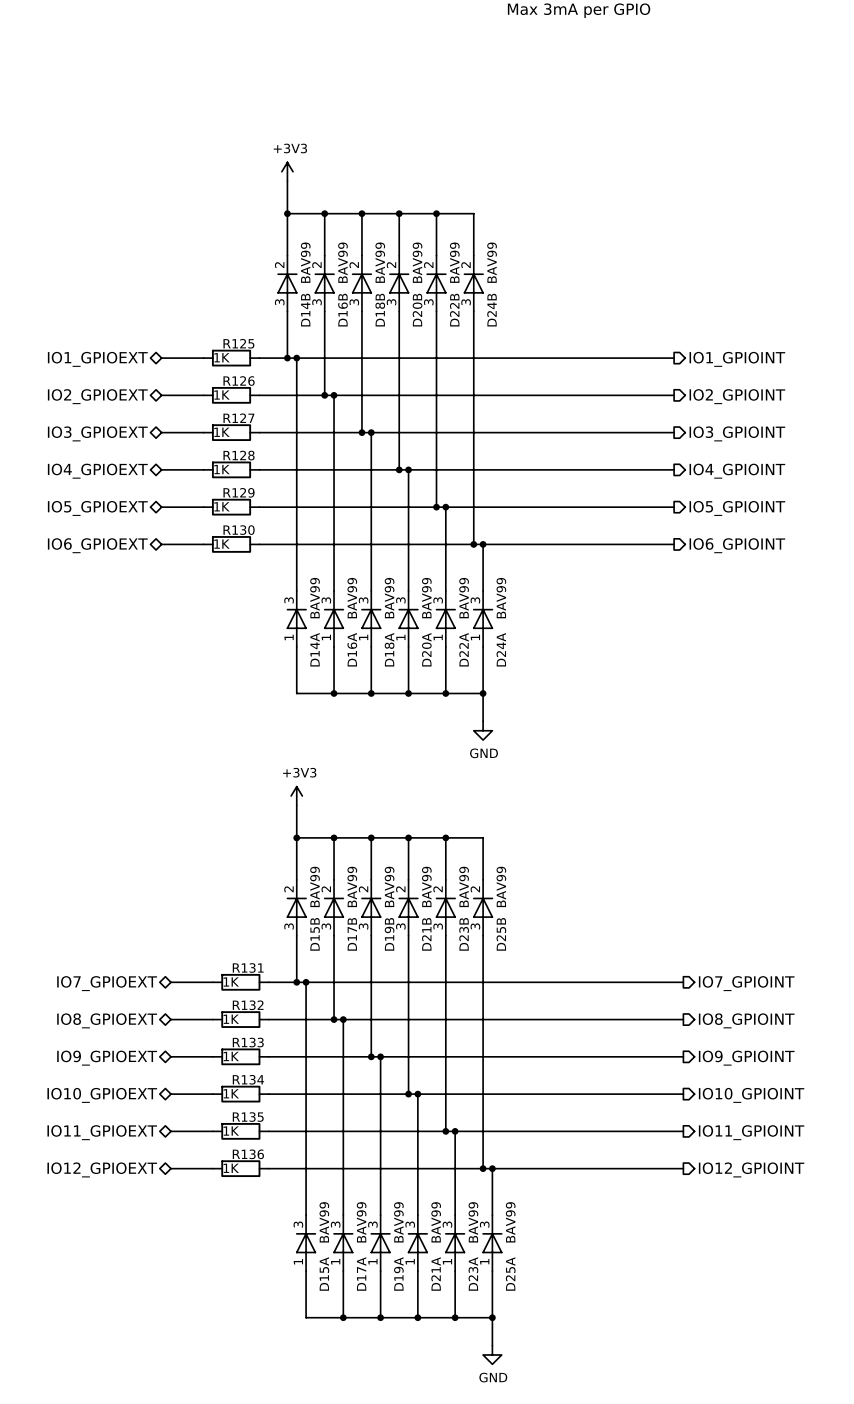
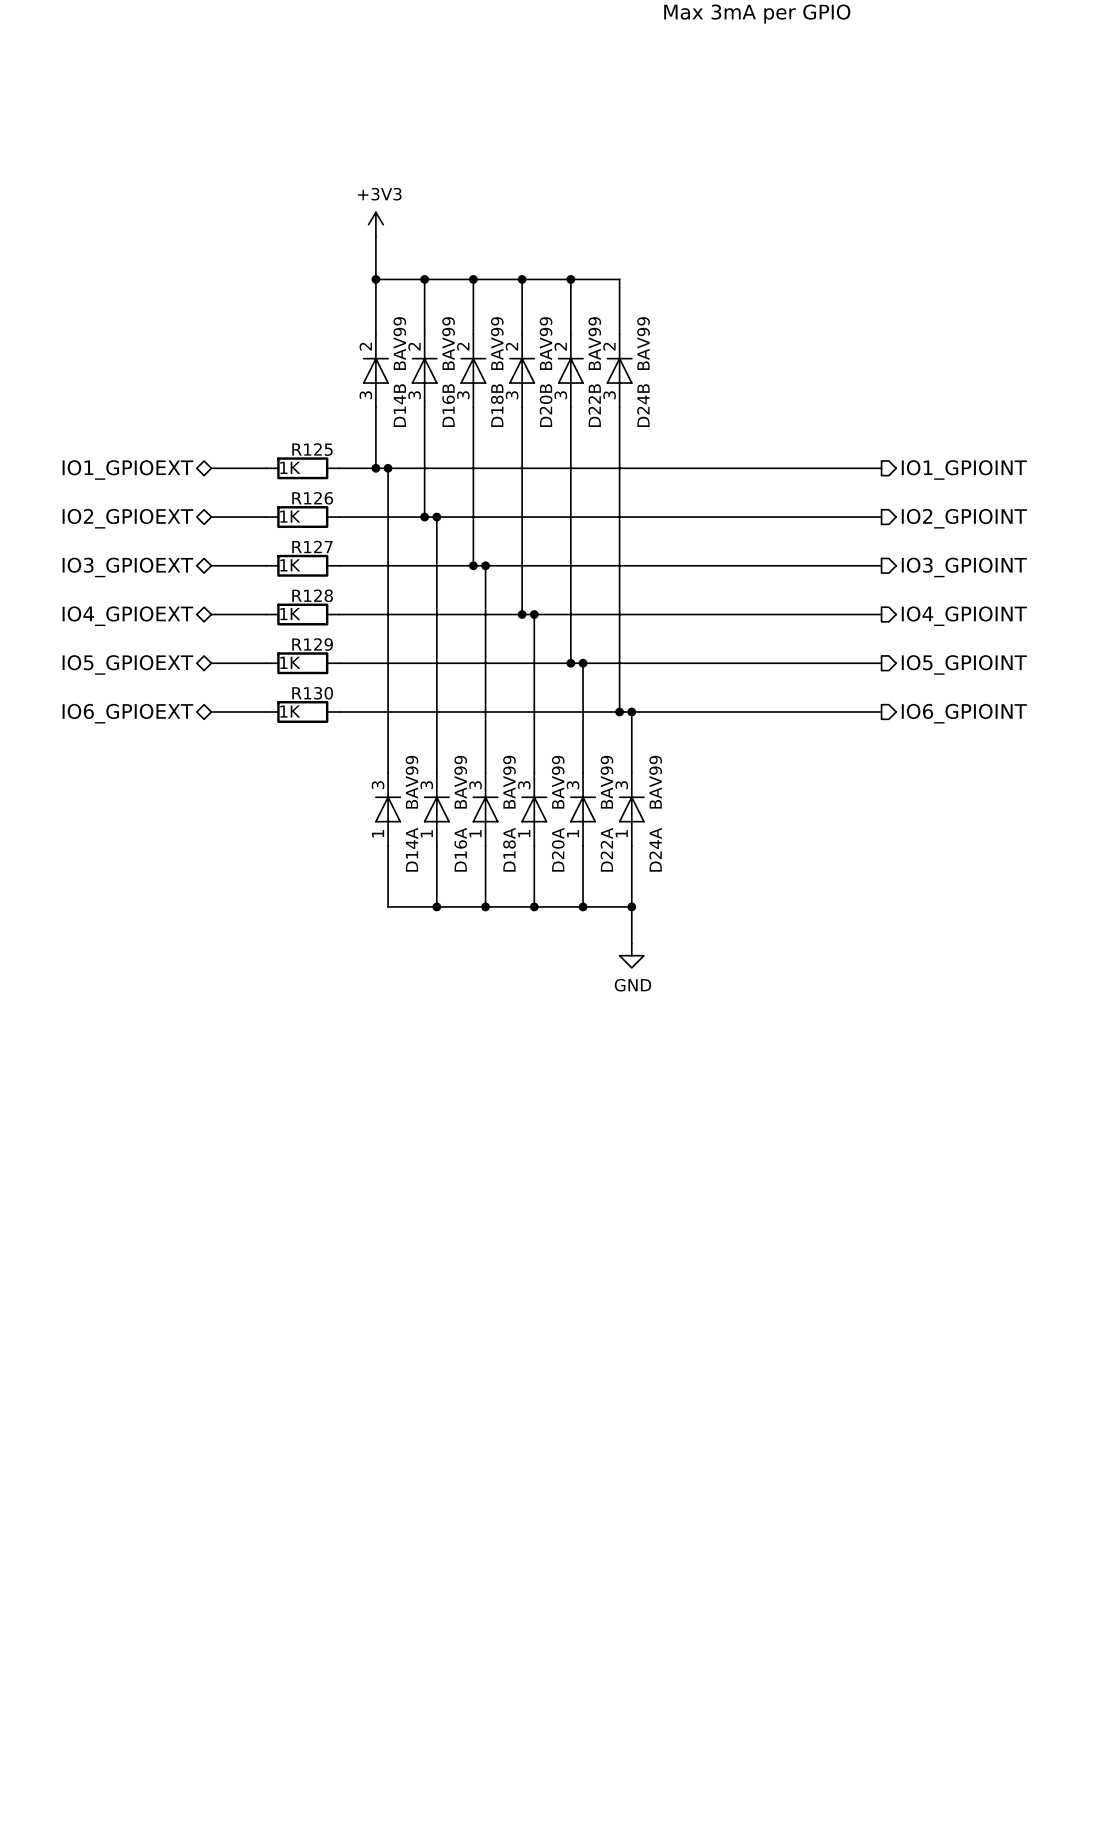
power symbol: +3V3 (296, 795) -> none
wire: (296, 805) (296, 879) -> none
wire: (296, 837) (483, 837) (483, 879) -> none
junction: (296, 837) -> none
wire: (334, 837) (334, 879) -> none
junction: (334, 837) -> none
wire: (371, 837) (371, 879) -> none
junction: (371, 837) -> none
wire: (408, 837) (408, 879) -> none
junction: (408, 837) -> none
wire: (445, 837) (445, 879) -> none
junction: (445, 837) -> none
D15B: BAV99 (296, 907) -> none
D17B: BAV99 (334, 907) -> none
D19B: BAV99 (371, 907) -> none
D21B: BAV99 (408, 907) -> none
D23B: BAV99 (445, 907) -> none
D25B: BAV99 (483, 907) -> none
wire: (296, 935) (296, 982) -> none
wire: (334, 935) (334, 1019) -> none
wire: (371, 935) (371, 1056) -> none
wire: (408, 935) (408, 1094) -> none
wire: (445, 935) (445, 1131) -> none
wire: (483, 935) (483, 1168) -> none
wire: (170, 982) (212, 982) -> none
R131: 1K (240, 982) -> none
wire: (268, 982) (683, 982) -> none
junction: (296, 982) -> none
wire: (306, 982) (306, 1215) -> none
junction: (306, 982) -> none
hierarchical label: IO7_GPIOEXT (107, 983) -> none
hierarchical label: IO7_GPIOINT (746, 983) -> none
wire: (170, 1019) (212, 1019) -> none
R132: 1K (240, 1019) -> none
wire: (268, 1019) (683, 1019) -> none
junction: (334, 1019) -> none
wire: (343, 1019) (343, 1215) -> none
junction: (343, 1019) -> none
hierarchical label: IO8_GPIOEXT (107, 1020) -> none
hierarchical label: IO8_GPIOINT (746, 1020) -> none
wire: (170, 1056) (212, 1056) -> none
R133: 1K (240, 1056) -> none
wire: (268, 1056) (683, 1056) -> none
junction: (371, 1056) -> none
wire: (380, 1056) (380, 1215) -> none
junction: (380, 1056) -> none
hierarchical label: IO9_GPIOEXT (107, 1058) -> none
hierarchical label: IO9_GPIOINT (746, 1058) -> none
wire: (170, 1094) (212, 1094) -> none
R134: 1K (240, 1094) -> none
wire: (268, 1094) (683, 1094) -> none
junction: (408, 1094) -> none
wire: (417, 1094) (417, 1215) -> none
junction: (417, 1094) -> none
hierarchical label: IO10_GPIOEXT (102, 1095) -> none
hierarchical label: IO10_GPIOINT (751, 1095) -> none
wire: (170, 1131) (212, 1131) -> none
R135: 1K (240, 1131) -> none
wire: (268, 1131) (683, 1131) -> none
junction: (445, 1131) -> none
wire: (455, 1131) (455, 1215) -> none
junction: (455, 1131) -> none
hierarchical label: IO11_GPIOEXT (102, 1132) -> none
hierarchical label: IO11_GPIOINT (751, 1132) -> none
wire: (170, 1168) (212, 1168) -> none
R136: 1K (240, 1168) -> none
wire: (268, 1168) (683, 1168) -> none
junction: (483, 1168) -> none
wire: (492, 1168) (492, 1215) -> none
junction: (492, 1168) -> none
hierarchical label: IO12_GPIOEXT (102, 1169) -> none
hierarchical label: IO12_GPIOINT (751, 1169) -> none
D15A: BAV99 (306, 1243) -> none
D17A: BAV99 (343, 1243) -> none
D19A: BAV99 (380, 1243) -> none
D21A: BAV99 (417, 1243) -> none
D23A: BAV99 (455, 1243) -> none
D25A: BAV99 (492, 1243) -> none
wire: (306, 1271) (306, 1317) (492, 1317) -> none
wire: (343, 1271) (343, 1317) -> none
wire: (380, 1271) (380, 1317) -> none
wire: (417, 1271) (417, 1317) -> none
wire: (455, 1271) (455, 1317) -> none
wire: (492, 1271) (492, 1345) -> none
junction: (343, 1317) -> none
junction: (380, 1317) -> none
junction: (417, 1317) -> none
junction: (455, 1317) -> none
junction: (492, 1317) -> none
power symbol: GND (492, 1354) -> none

